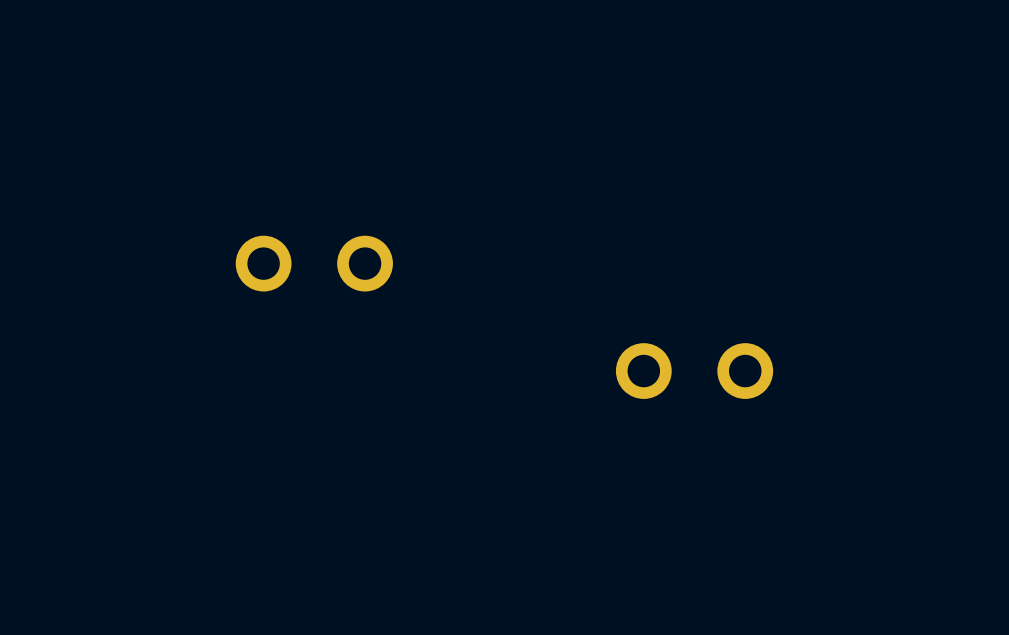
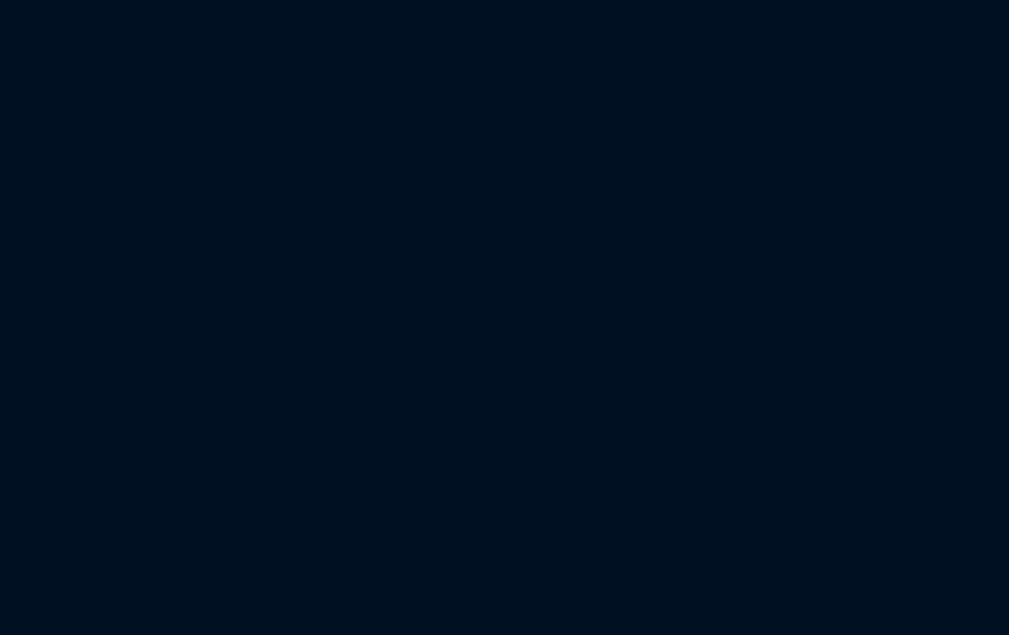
part: (314, 263) -> none
part: (694, 371) -> none

